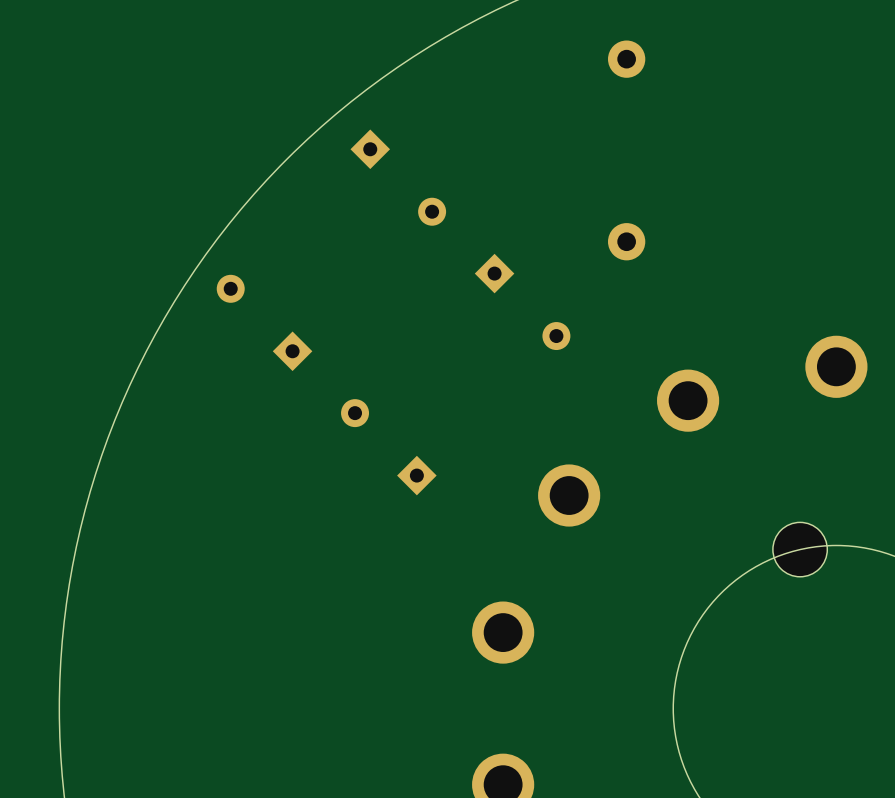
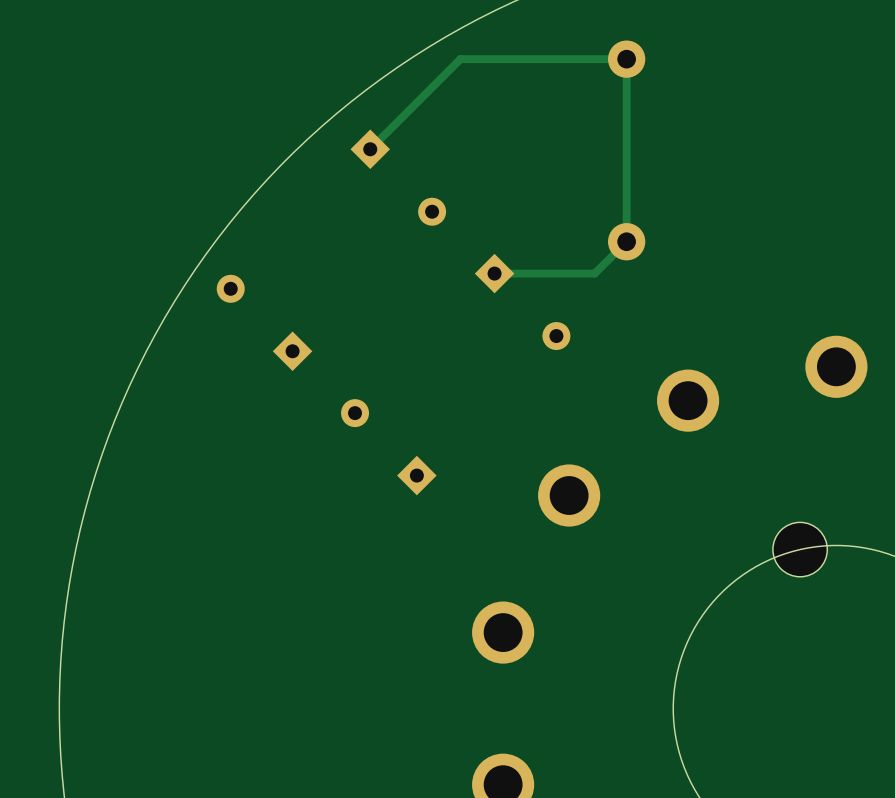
track: none -> (370, 149) (460, 59) (626, 59) (626, 241) (594, 273) (494, 273)

